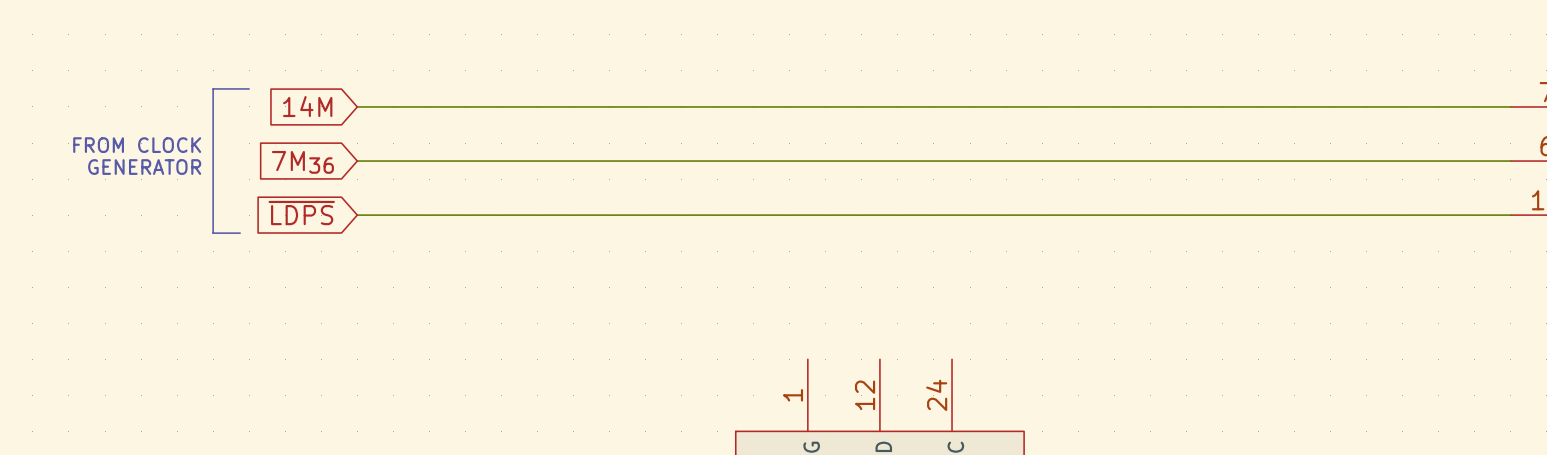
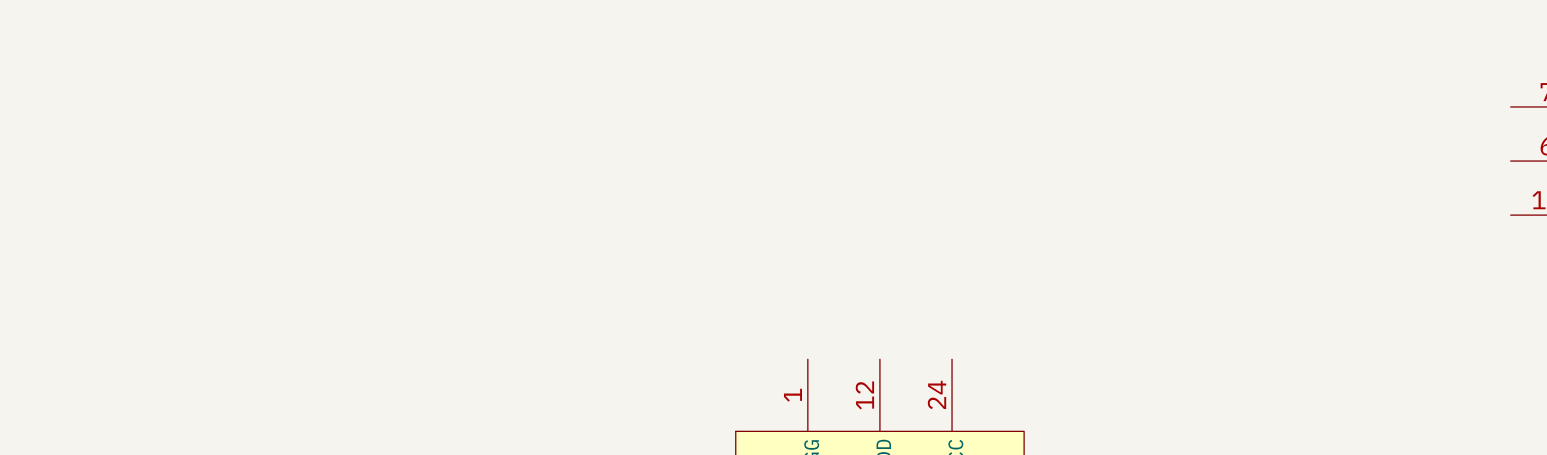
line: (249, 88) (213, 88) (213, 233) (240, 233) -> none
global label: 14M (307, 106) -> none
wire: (357, 106) (1510, 106) -> none
text: FROM CLOCK (137, 145) -> none
wire: (357, 161) (1510, 161) -> none
global label: 7M36 (302, 162) -> none
text: GENERATOR (144, 167) -> none
global label: ~{LDPS} (301, 213) -> none
wire: (357, 215) (1510, 215) -> none

